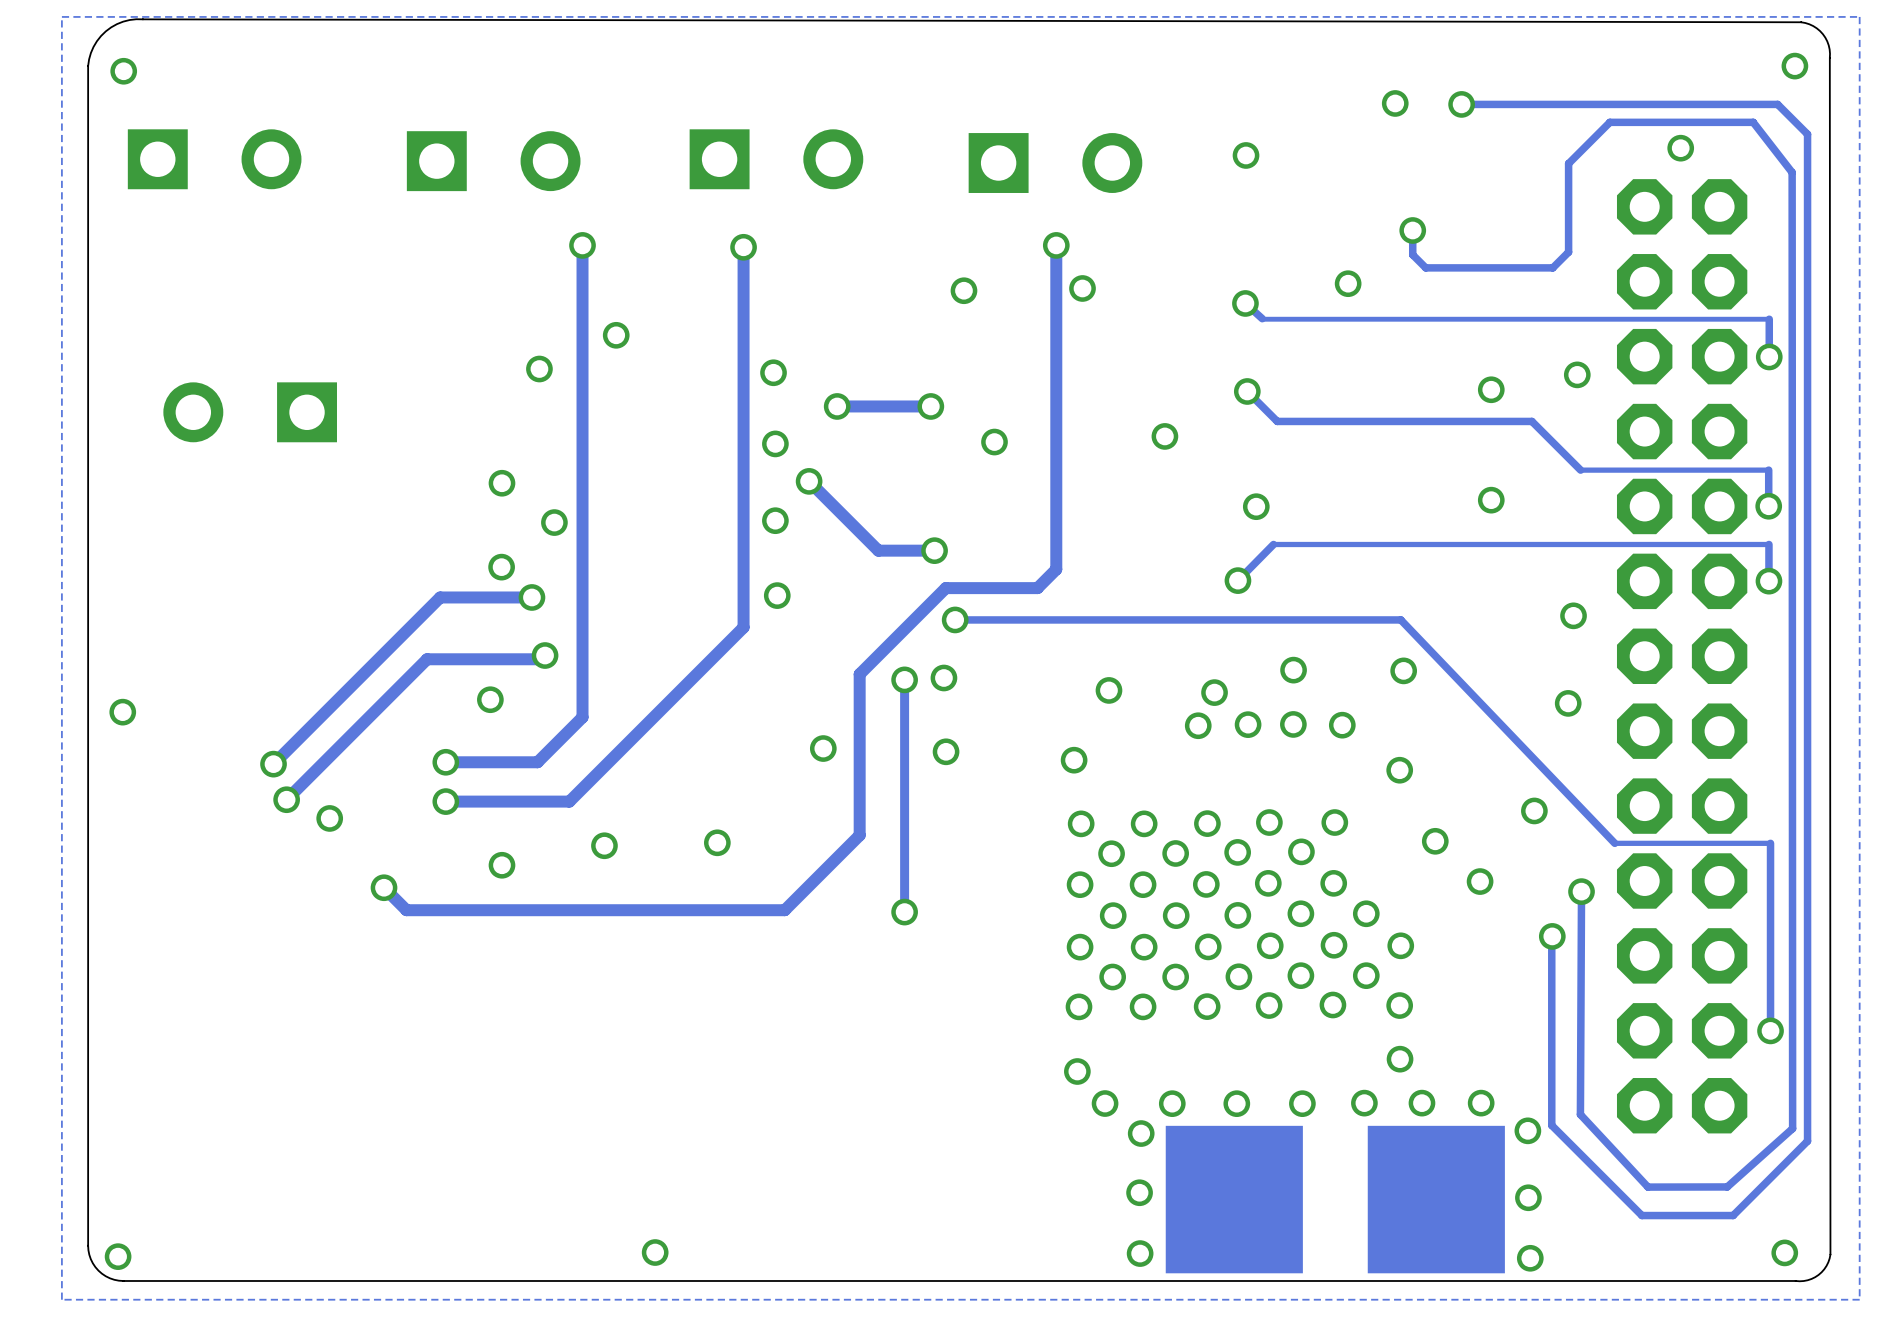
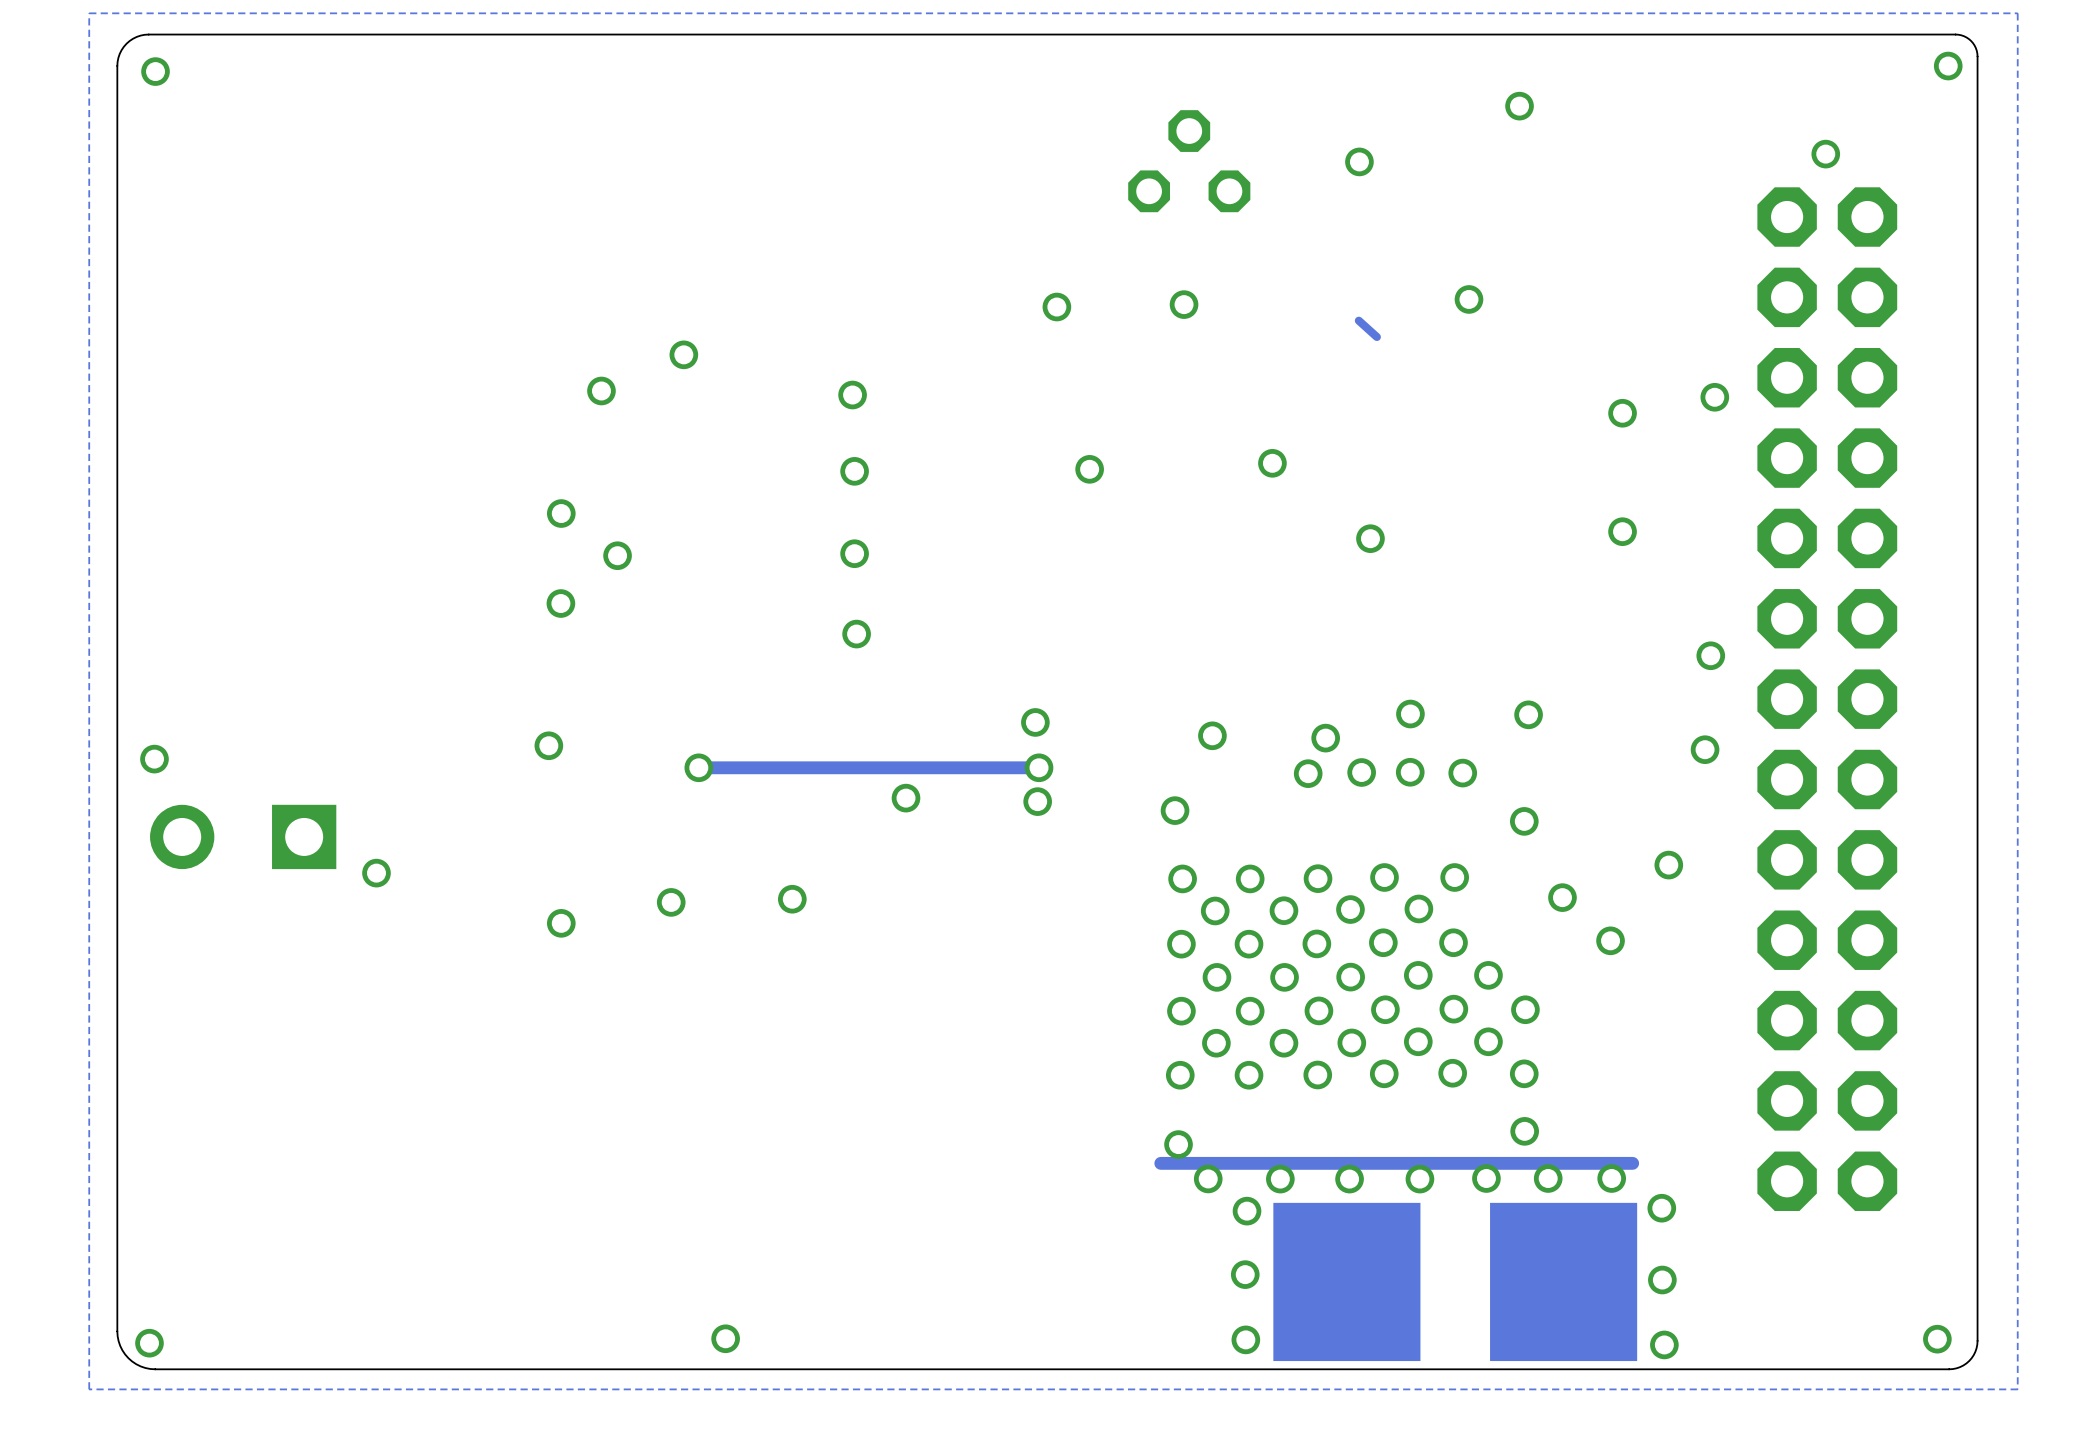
board edge: (88, 66) (93, 46) (101, 35) (117, 24) (136, 19) (1801, 22) (1816, 28) (1827, 41) (1830, 53) (1830, 1254) (1826, 1265) (1818, 1274) (1807, 1280) (1795, 1280) -> (117, 65) (119, 53) (126, 43) (136, 36) (148, 34) (1955, 34) (1968, 39) (1975, 48) (1977, 56) (1977, 1340) (1975, 1351) (1969, 1360) (1960, 1367) (1949, 1369)
track: (1461, 104) (1777, 104) (1807, 134) (1807, 1141) (1733, 1215) (1641, 1215) (1551, 1125) (1552, 936) -> none
via: (1461, 104) -> none
part: none -> (1189, 161)
part: (214, 159) -> none
part: (776, 159) -> none
part: (493, 161) -> none
part: (1055, 163) -> none
track: (1412, 230) (1412, 254) (1425, 267) (1552, 267) (1568, 252) (1568, 163) (1609, 122) (1753, 122) (1792, 172) (1792, 1128) (1727, 1186) (1647, 1187) (1580, 1114) (1581, 891) -> none
via: (1412, 230) -> none
track: (582, 245) (582, 717) (537, 762) (445, 762) -> none
via: (582, 245) -> none
track: (1056, 245) (1056, 569) (1037, 588) (945, 588) (859, 674) (859, 835) (784, 910) (406, 910) (384, 887) -> none
via: (1056, 245) -> none
track: (743, 247) (743, 627) (569, 801) (445, 801) -> none
via: (743, 247) -> none
via: (1245, 303) -> none
track: (1262, 319) (1769, 319) (1769, 356) -> none
via: (1769, 356) -> none
track: (1247, 391) (1277, 421) (1531, 421) (1580, 470) (1768, 470) (1768, 506) -> none
via: (1247, 391) -> none
via: (837, 406) -> none
track: (930, 406) (837, 406) -> none
via: (930, 406) -> none
part: (250, 412) -> none
track: (809, 481) (878, 550) (934, 550) -> none
via: (809, 481) -> none
via: (1768, 506) -> none
via: (934, 550) -> none
track: (1237, 580) (1273, 544) (1768, 544) (1768, 581) -> none
via: (1237, 580) -> none
via: (1768, 581) -> none
track: (531, 597) (440, 597) (273, 764) -> none
via: (531, 597) -> none
track: (955, 619) (1400, 619) (1614, 843) (1770, 843) (1770, 1030) -> none
via: (955, 619) -> none
track: (545, 655) (541, 659) (427, 659) (286, 799) -> none
via: (545, 655) -> none
track: (904, 679) (904, 912) -> none
via: (904, 679) -> none
via: none -> (698, 767)
track: none -> (1039, 767) (698, 767)
via: none -> (1039, 767)
via: (445, 762) -> none
via: (273, 764) -> none
part: none -> (243, 836)
via: (286, 799) -> none
via: (445, 801) -> none
via: (384, 887) -> none
via: (1581, 891) -> none
via: (904, 912) -> none
via: (1552, 936) -> none
via: (1770, 1030) -> none
track: none -> (1632, 1163) (1160, 1163)

